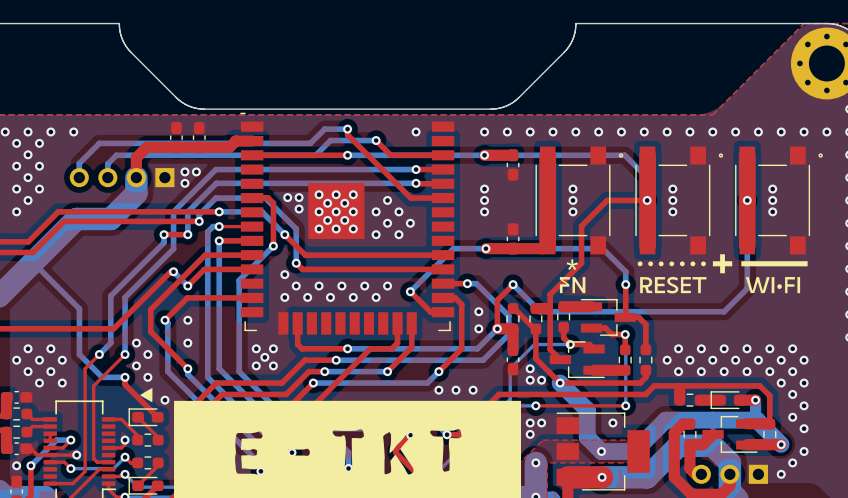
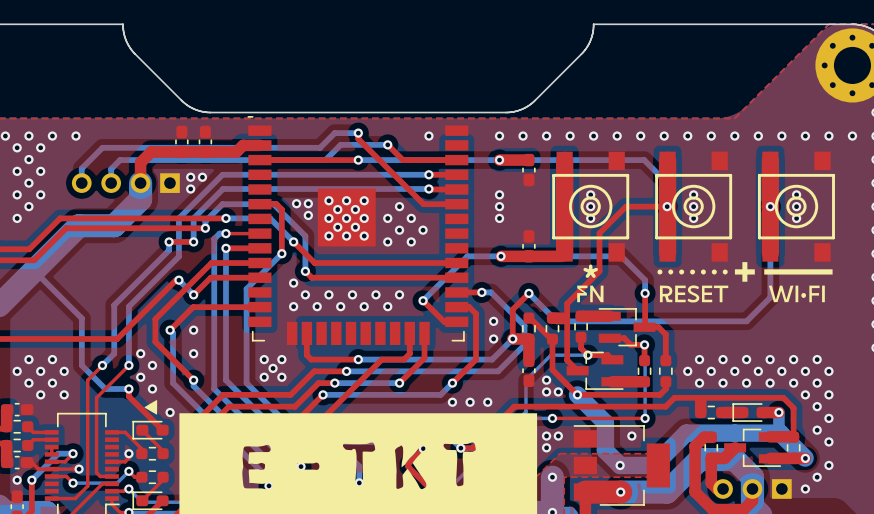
part footprint: [535, 146, 624, 255] -> [552, 151, 630, 262]
part footprint: [635, 146, 724, 255] -> [655, 151, 733, 262]
part footprint: [735, 146, 823, 255] -> [757, 151, 835, 262]

